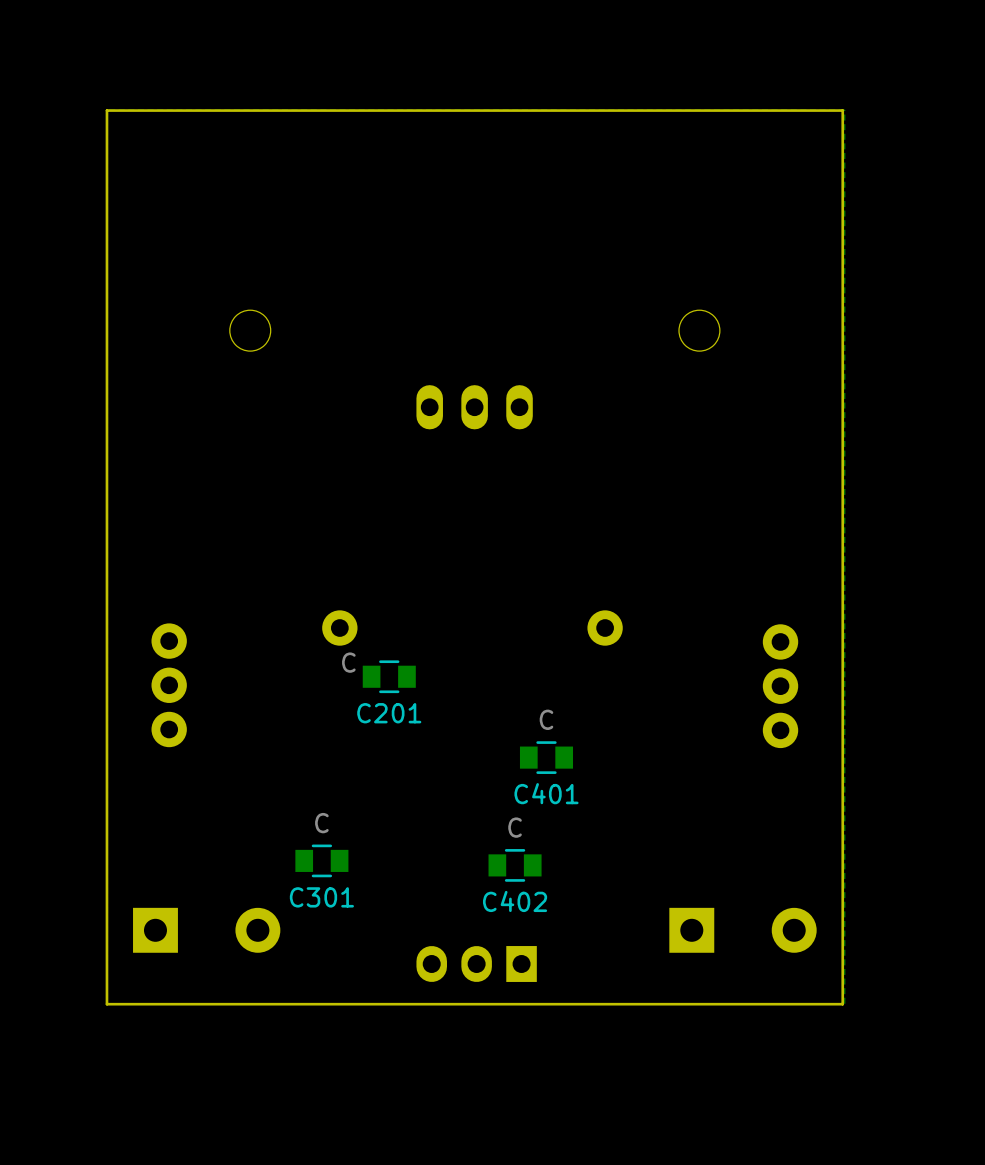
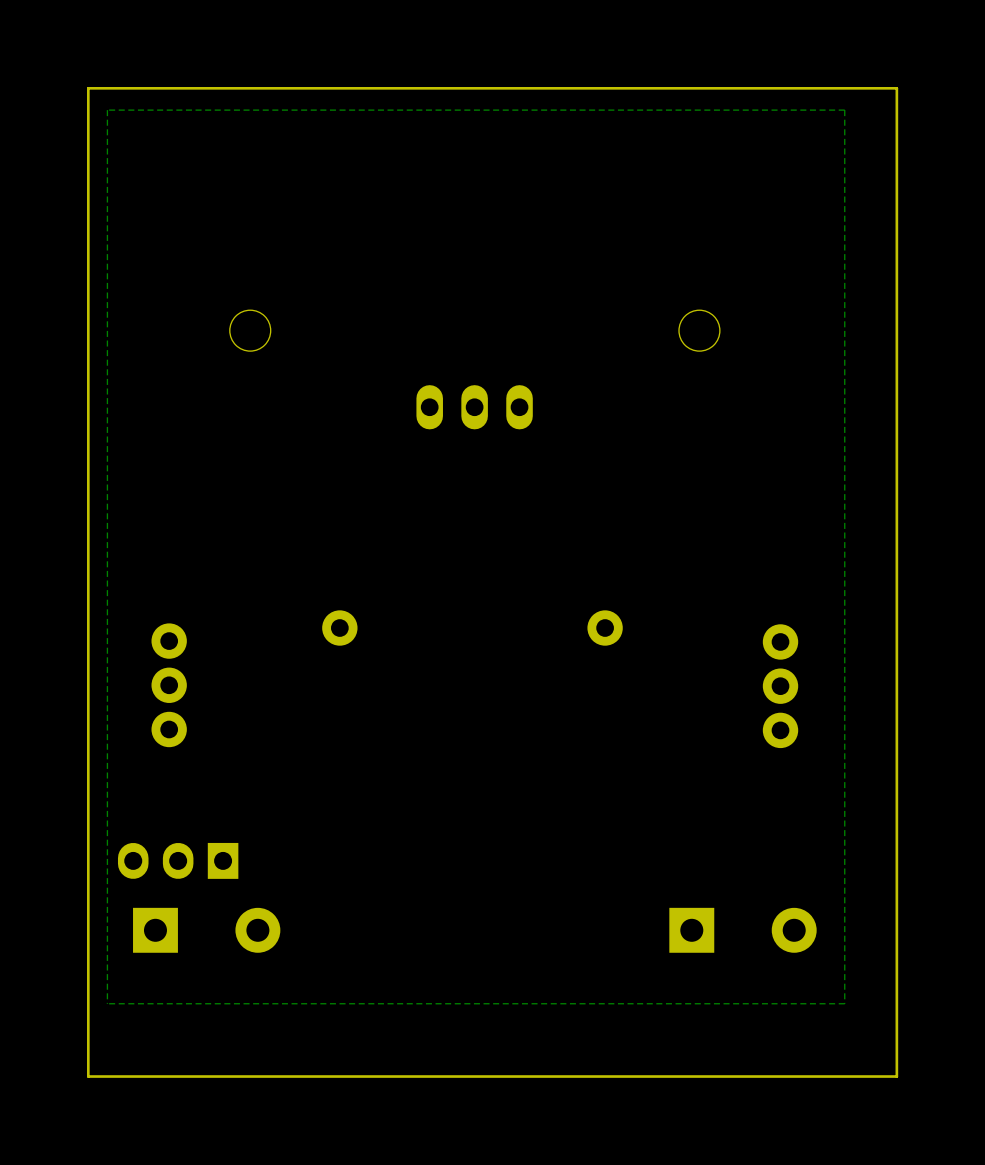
board edge: (842, 110) (106, 110) (106, 1004) (842, 1004) (842, 110) -> (896, 88) (896, 1076) (88, 1076) (88, 88) (896, 88)
C201: C (389, 676) -> none
C401: C (546, 757) -> none
C301: C (321, 860) -> none
C402: C (515, 865) -> none
part position: (476, 964) -> (178, 860)

